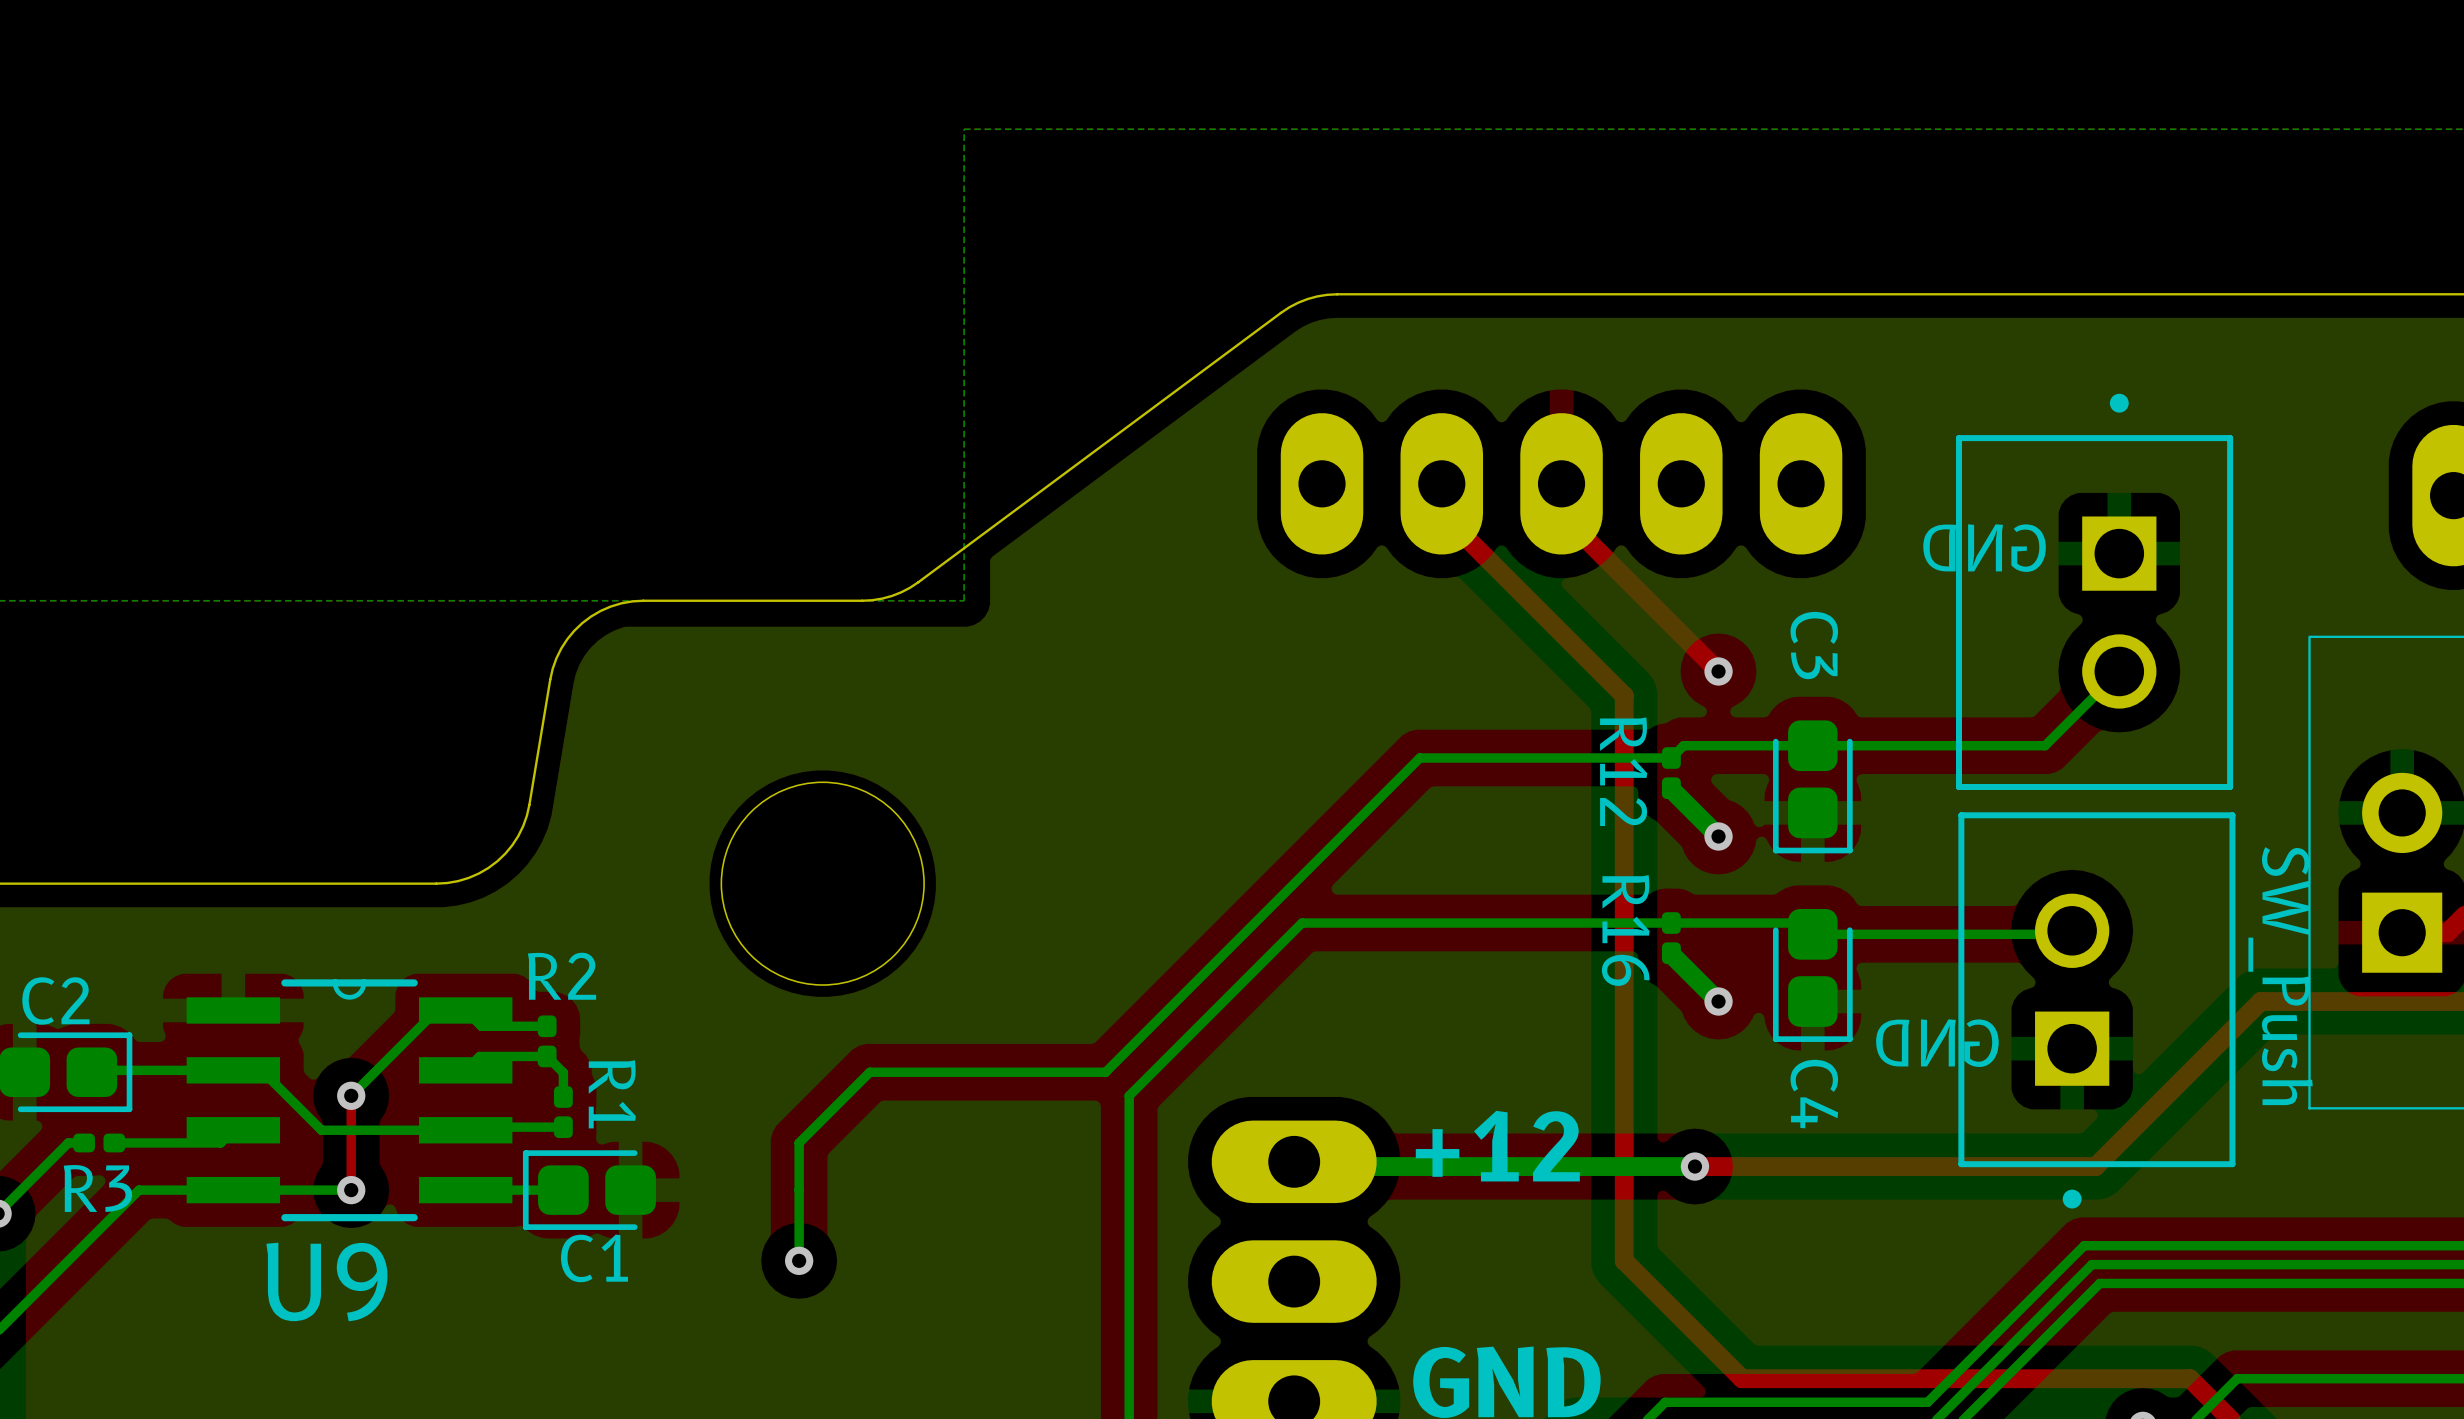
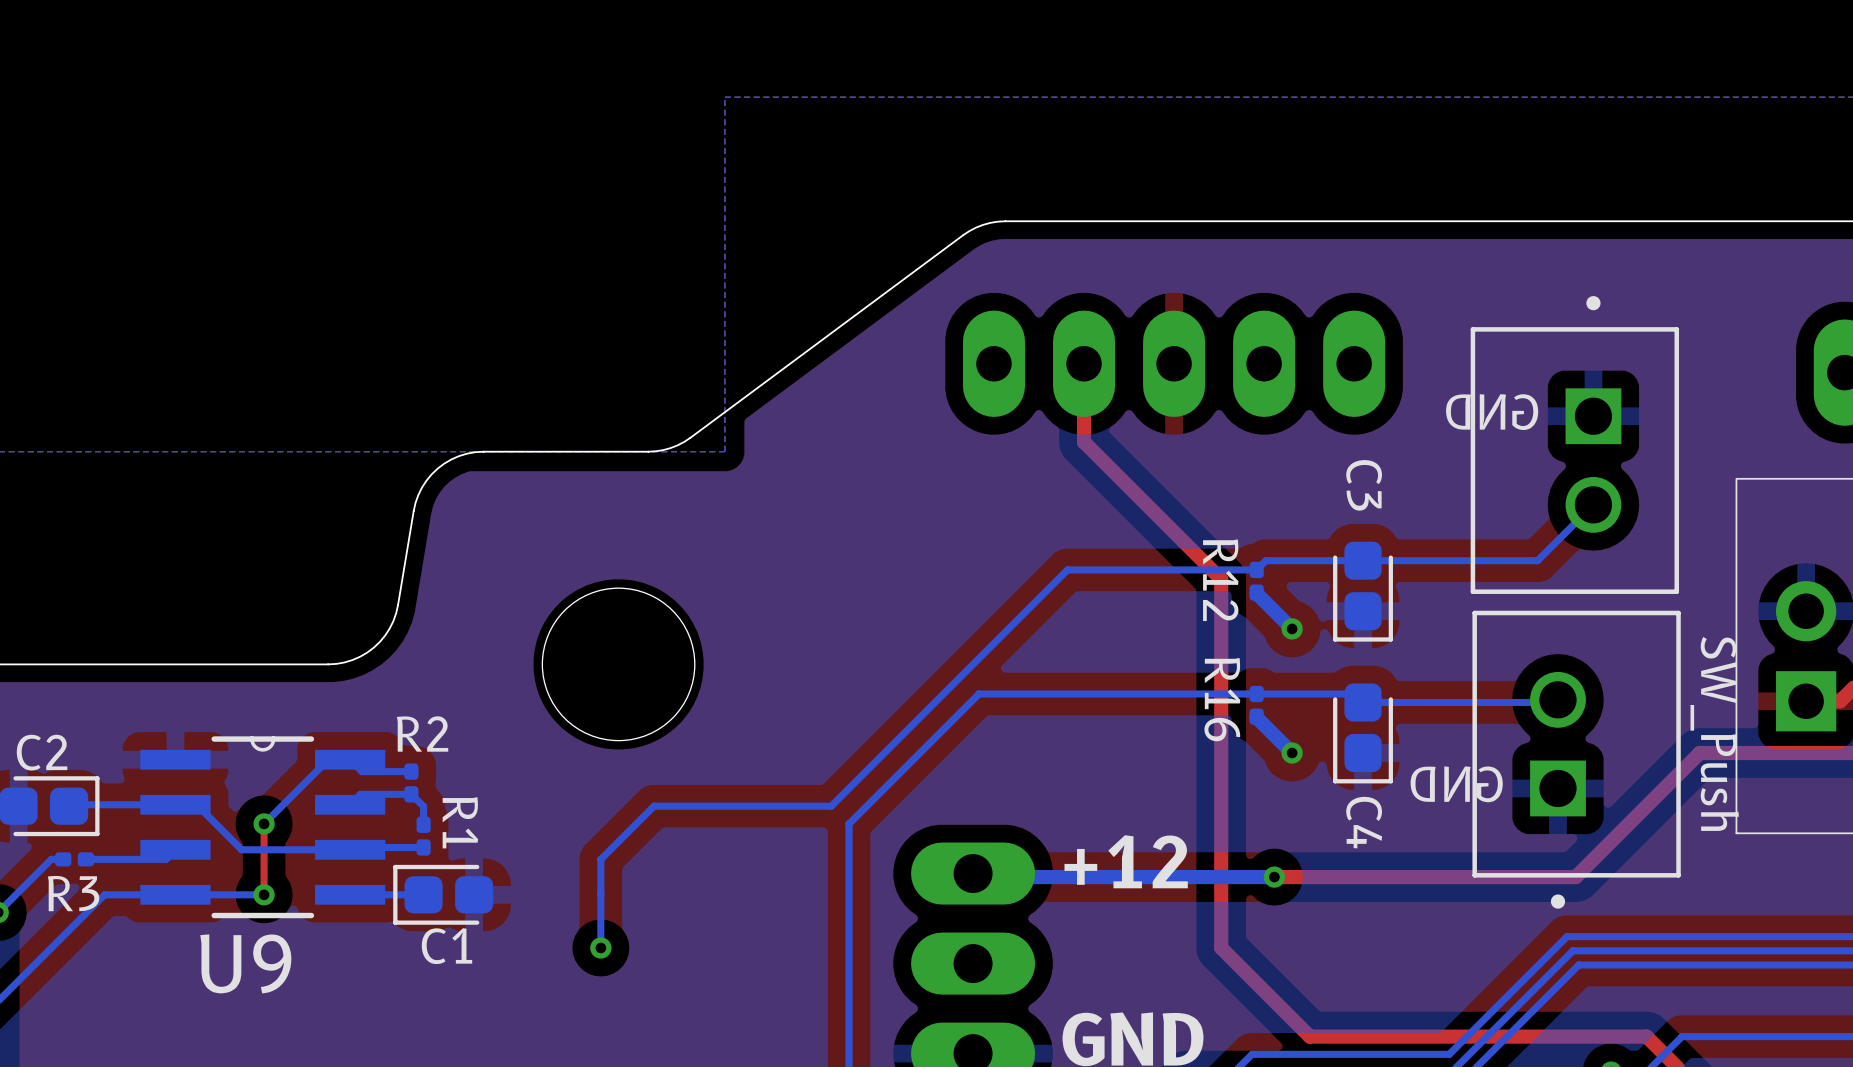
top track: (1441, 513) (1624, 695) (1624, 770) -> (1084, 385) (1084, 442) (1221, 579)
top track: (1561, 514) (1718, 671) -> none
via: (1718, 671) -> none

